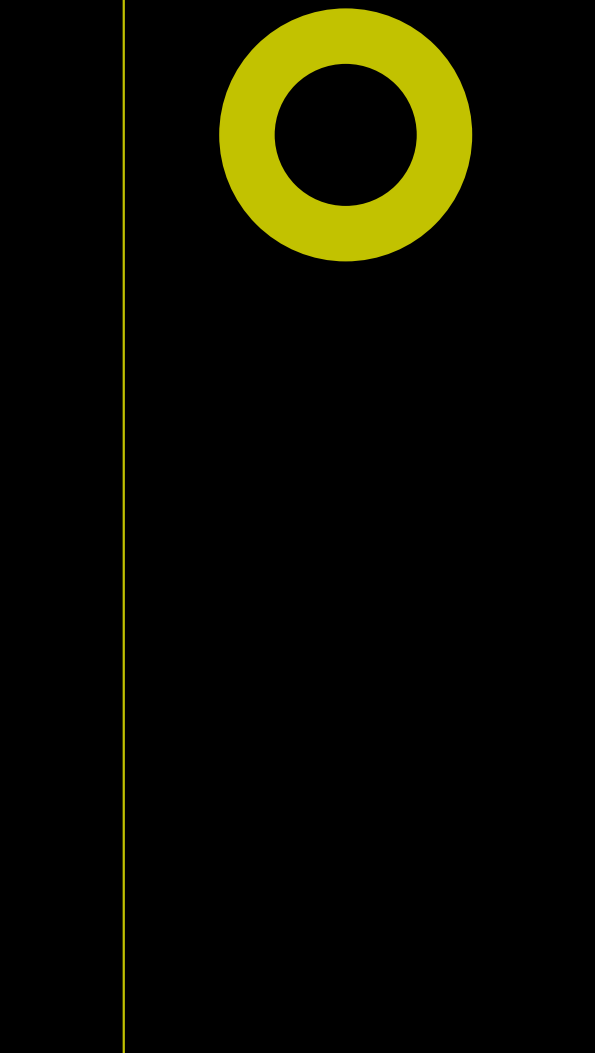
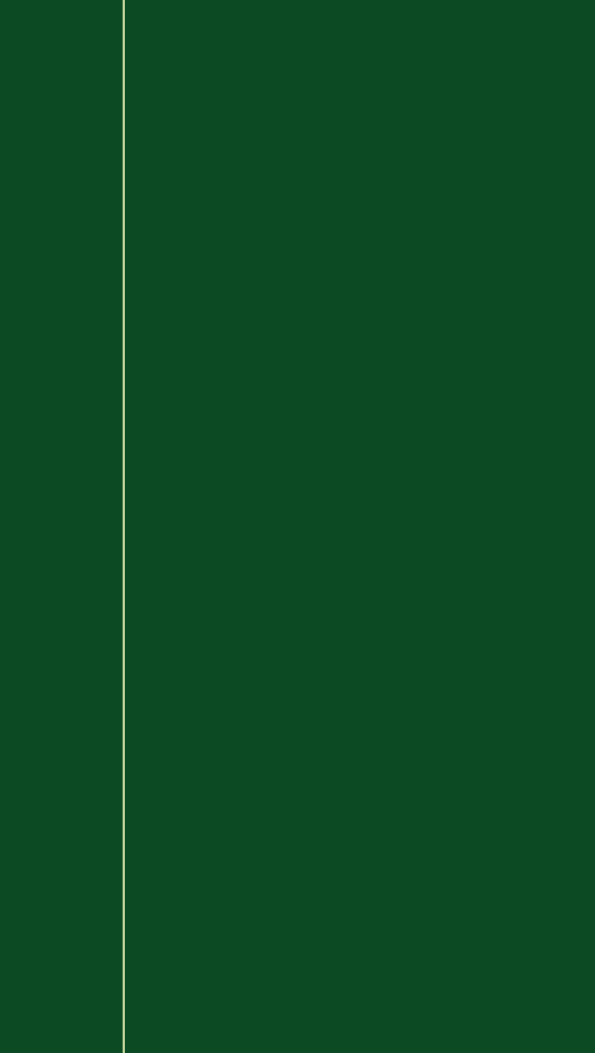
part: (345, 134) -> none

